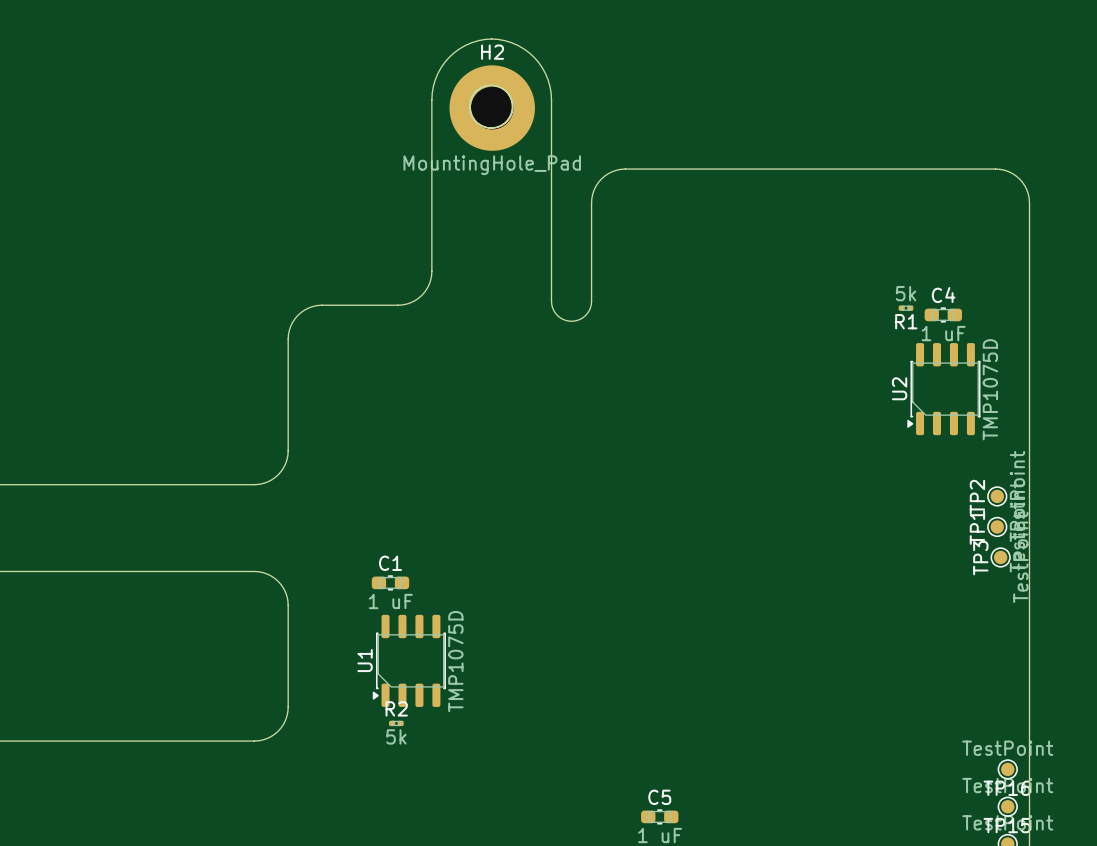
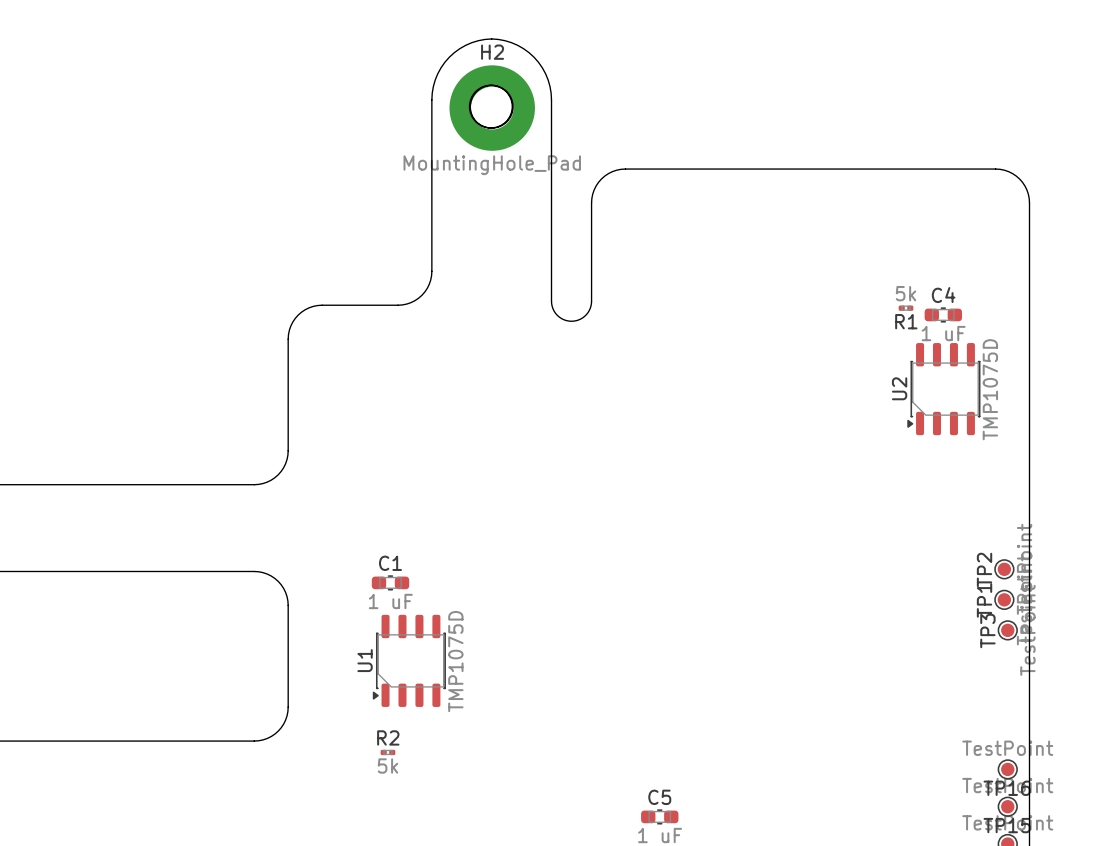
TP2 position: (997, 496) -> (1004, 569)
TP1 position: (997, 526) -> (1004, 599)
TP3 position: (1000, 557) -> (1007, 630)
R2 position: (396, 723) -> (387, 752)

